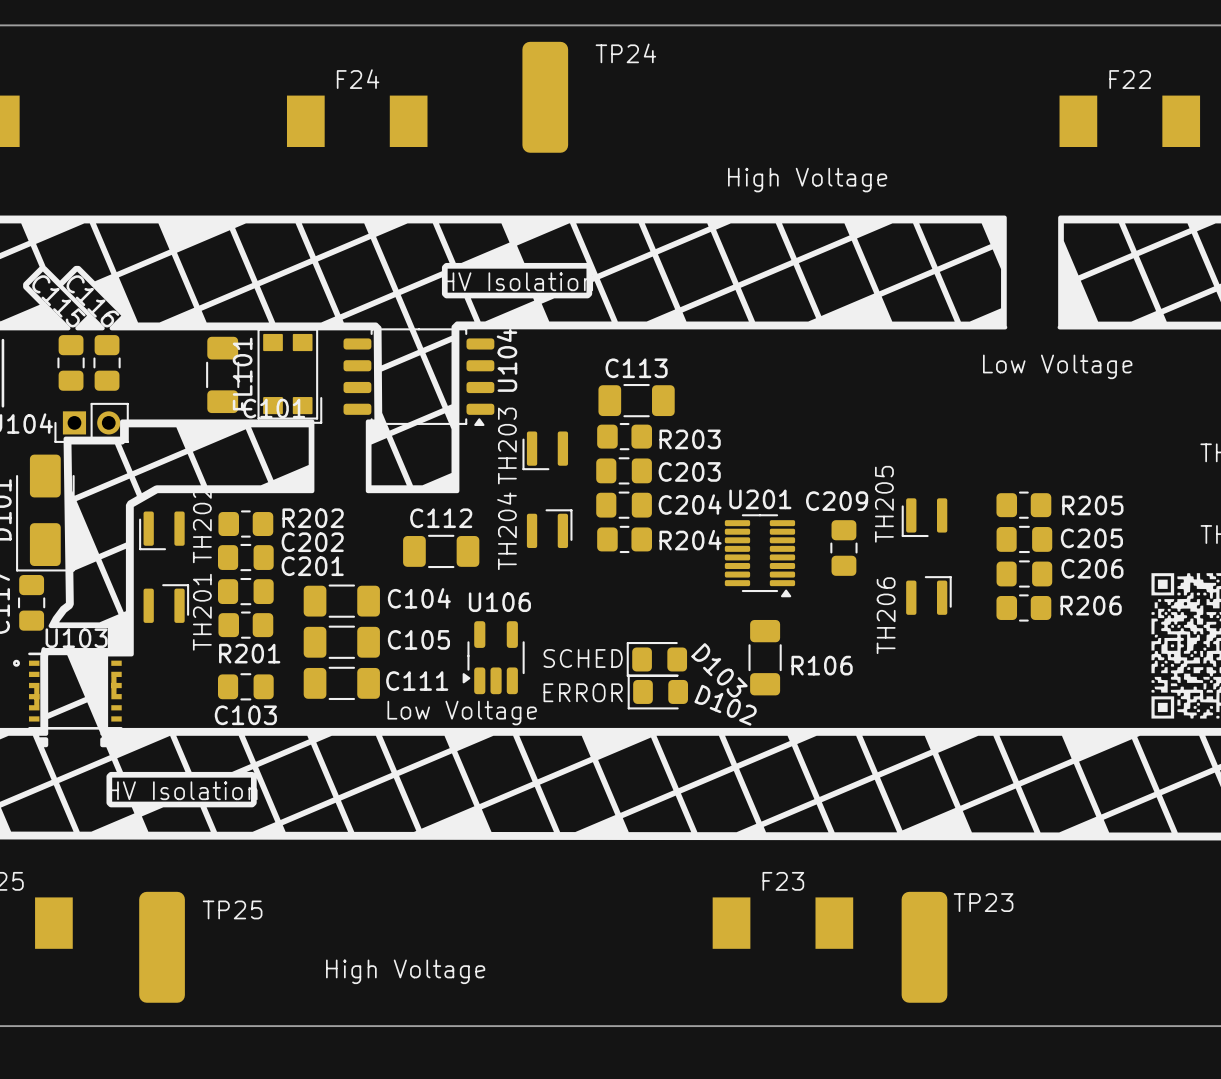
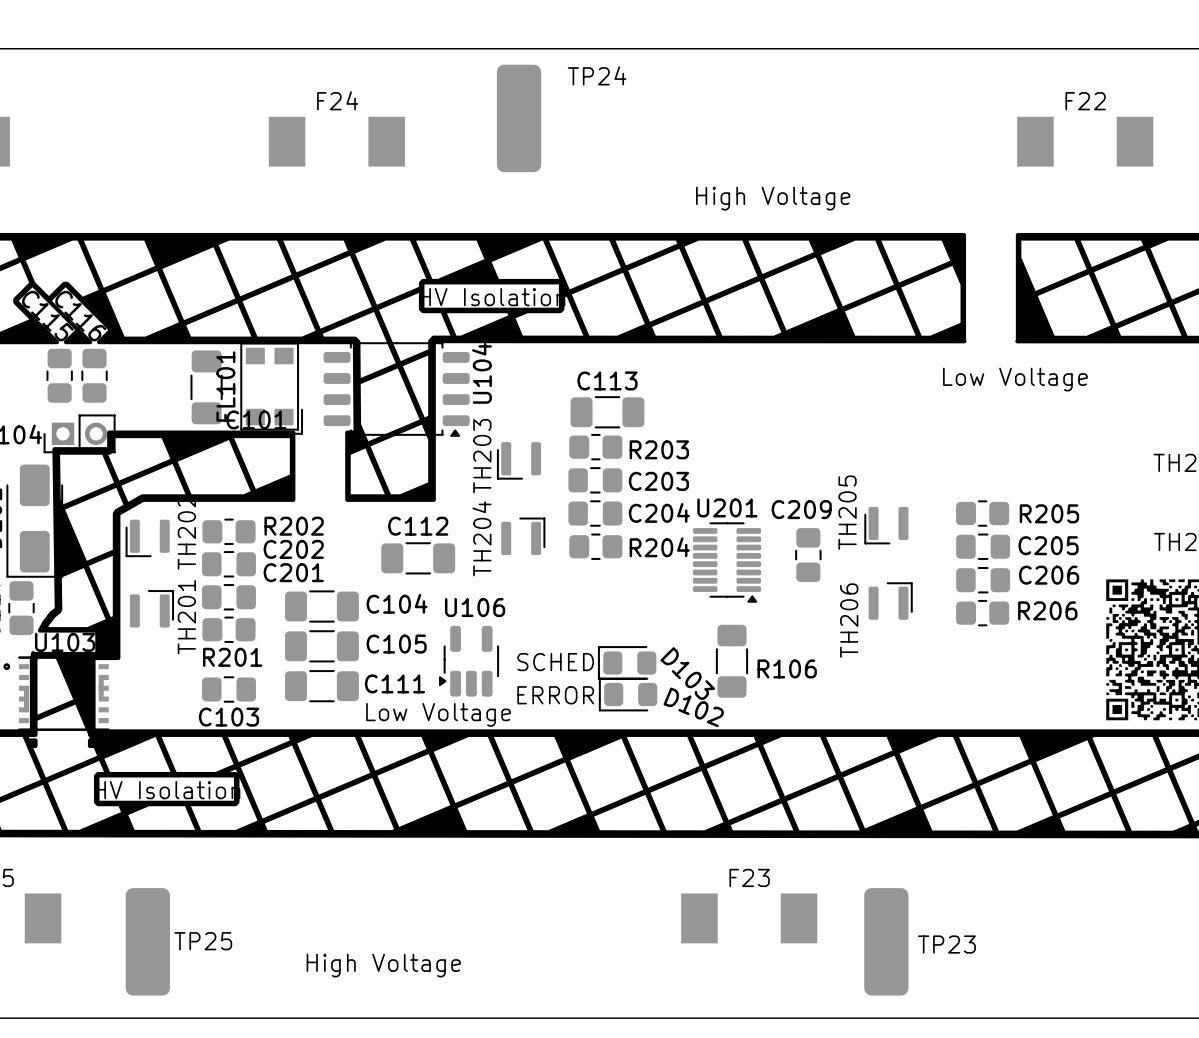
TP23 name position: TP23 (983, 902) -> TP23 (947, 944)
TP25 name position: TP25 (232, 909) -> TP25 (203, 941)

